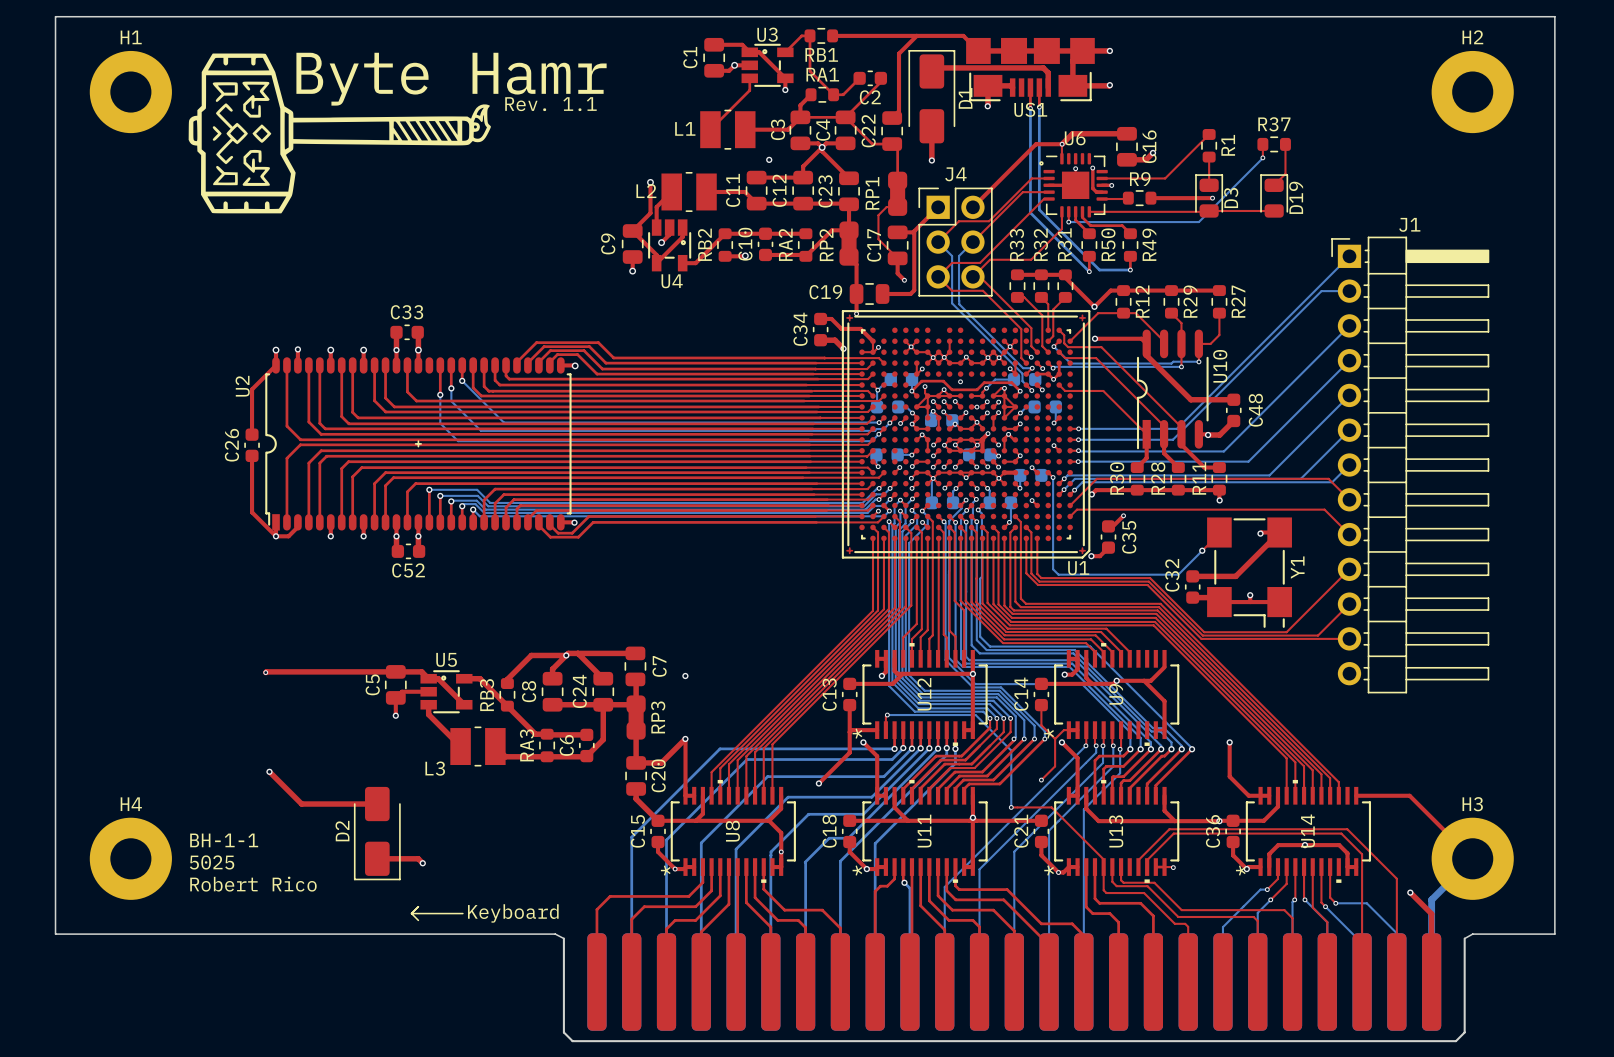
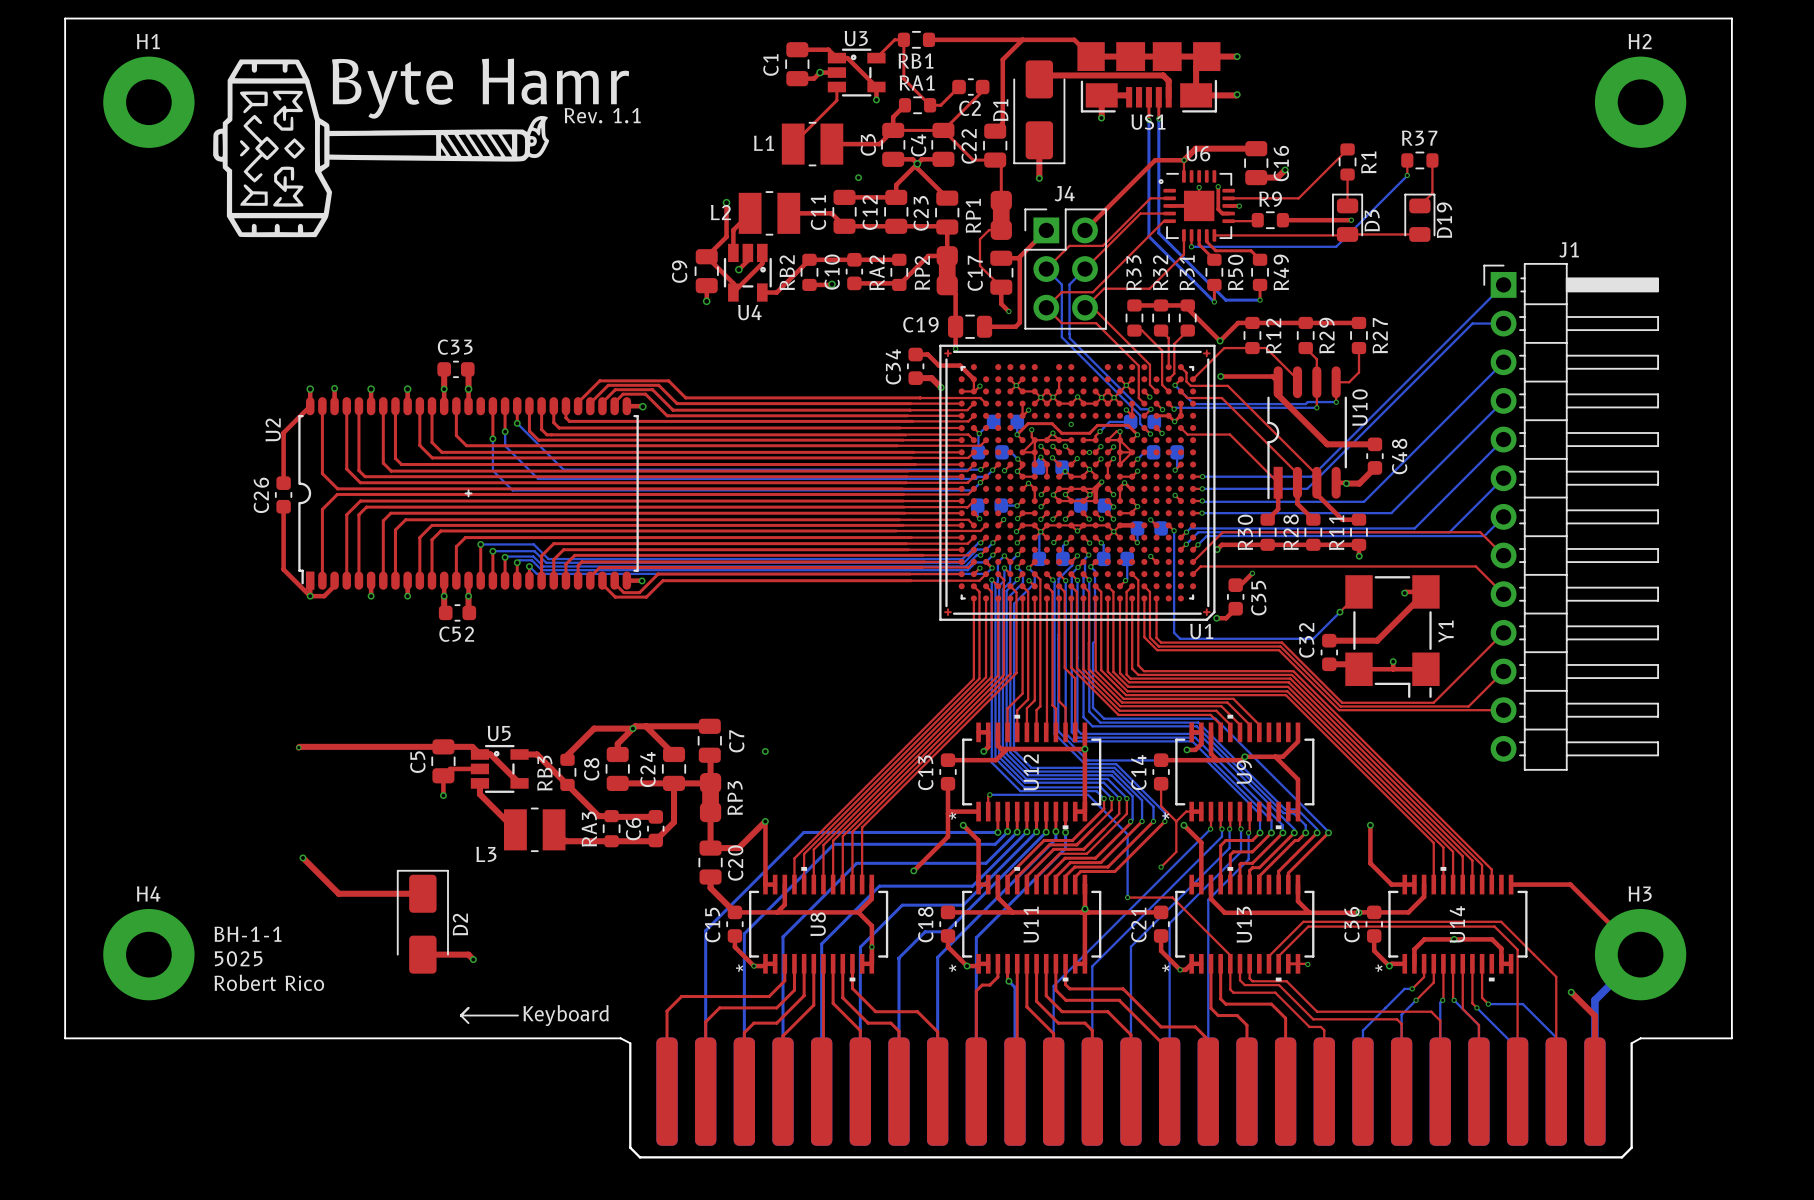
D1 rotation: 0° (931, 96) -> 180° (1039, 112)
D2 rotation: 0° (377, 833) -> 180° (422, 921)

